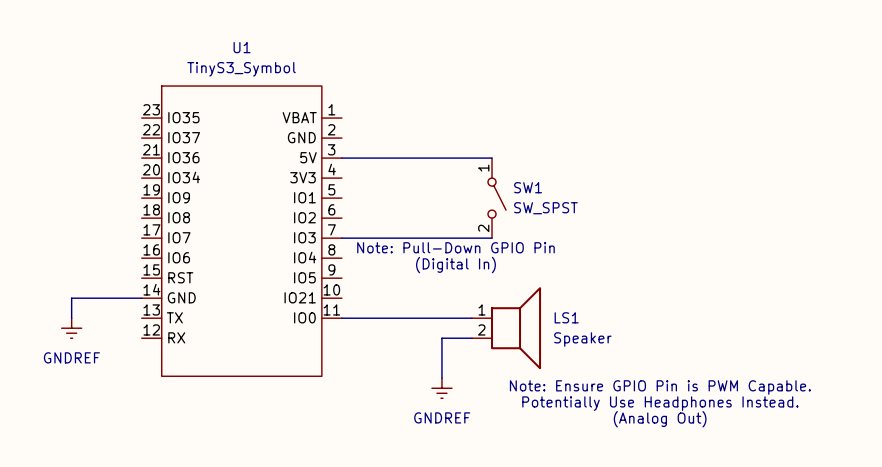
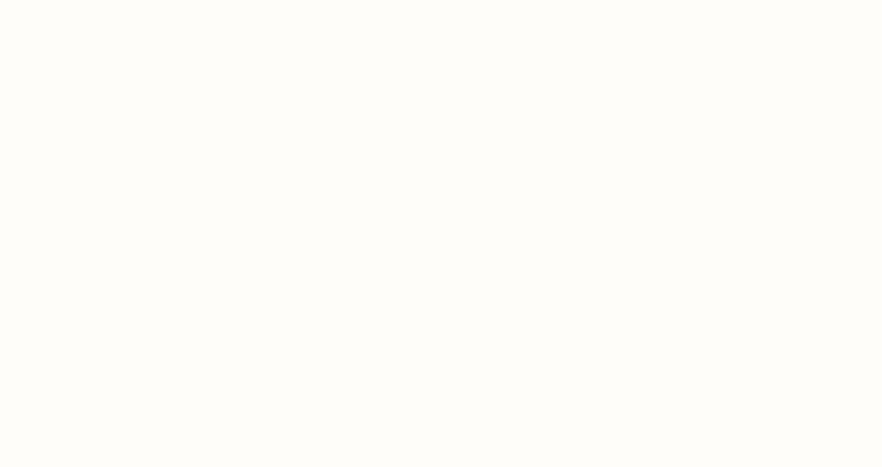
wire: (341, 158) (492, 158) -> none
SW1: SW_SPST (497, 198) -> none
U1: TinyS3_Symbol (241, 231) -> none
wire: (341, 238) (492, 238) -> none
text: Note: Pull-Down GPIO Pin (455, 247) -> none
text: (Digital In) (455, 265) -> none
wire: (141, 298) (71, 298) (71, 318) -> none
wire: (341, 318) (471, 318) -> none
power symbol: GNDREF (71, 328) -> none
LS1: Speaker (506, 328) -> none
wire: (471, 338) (441, 338) (441, 378) -> none
text: Note: Ensure GPIO Pin is PWM Capable. (660, 387) -> none
power symbol: GNDREF (441, 388) -> none
text: Potentially Use Headphones Instead. (660, 403) -> none
text: (Analog Out) (660, 419) -> none

